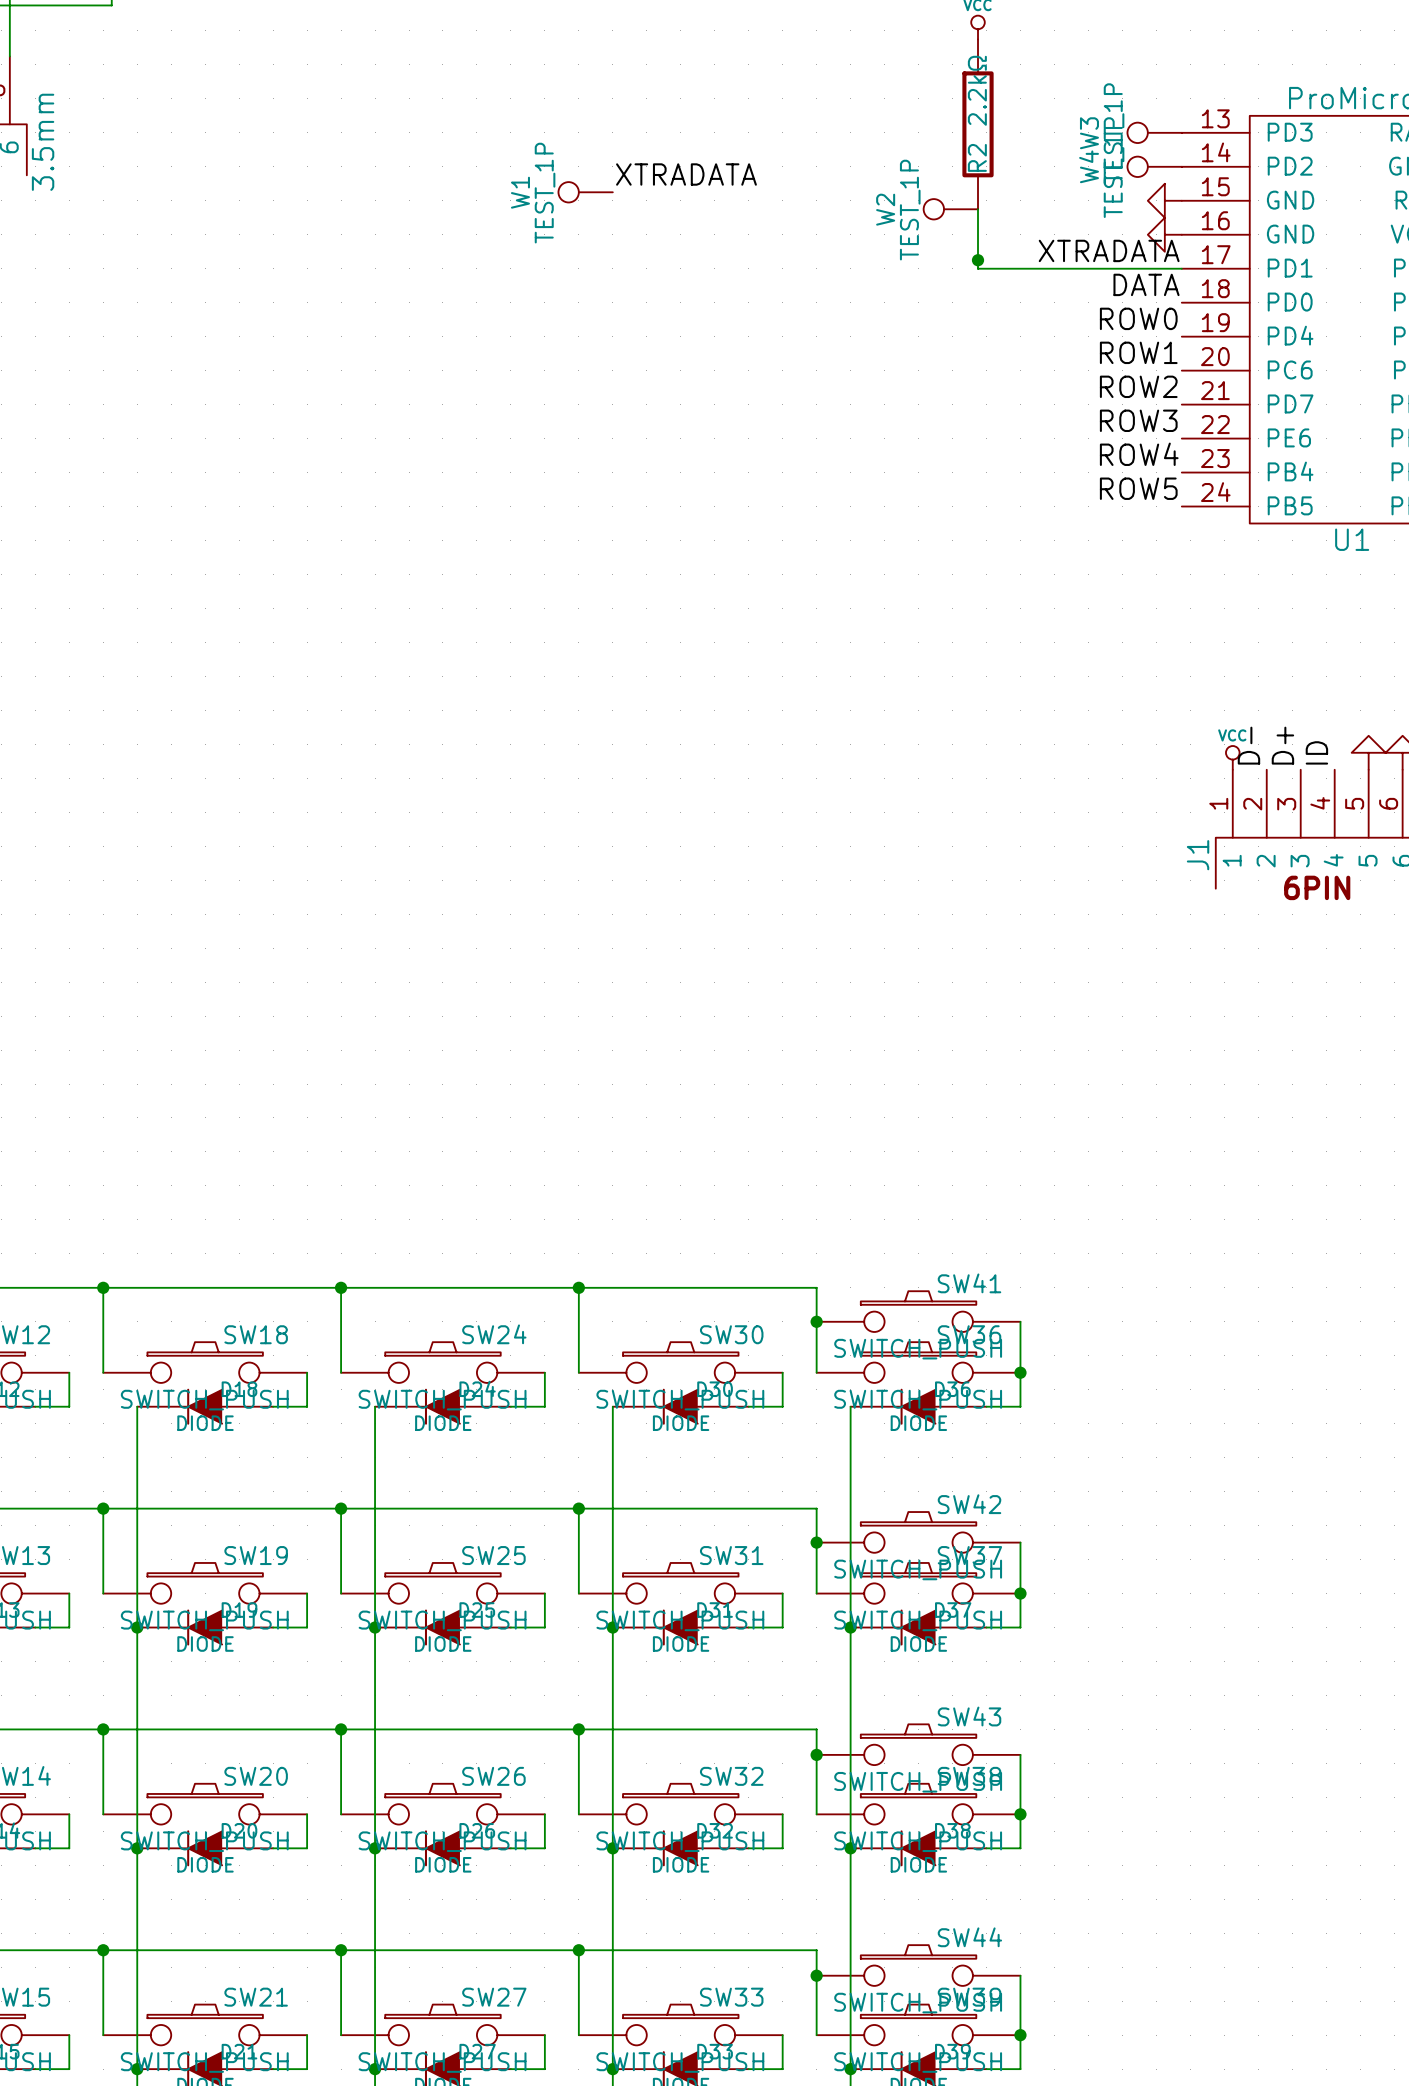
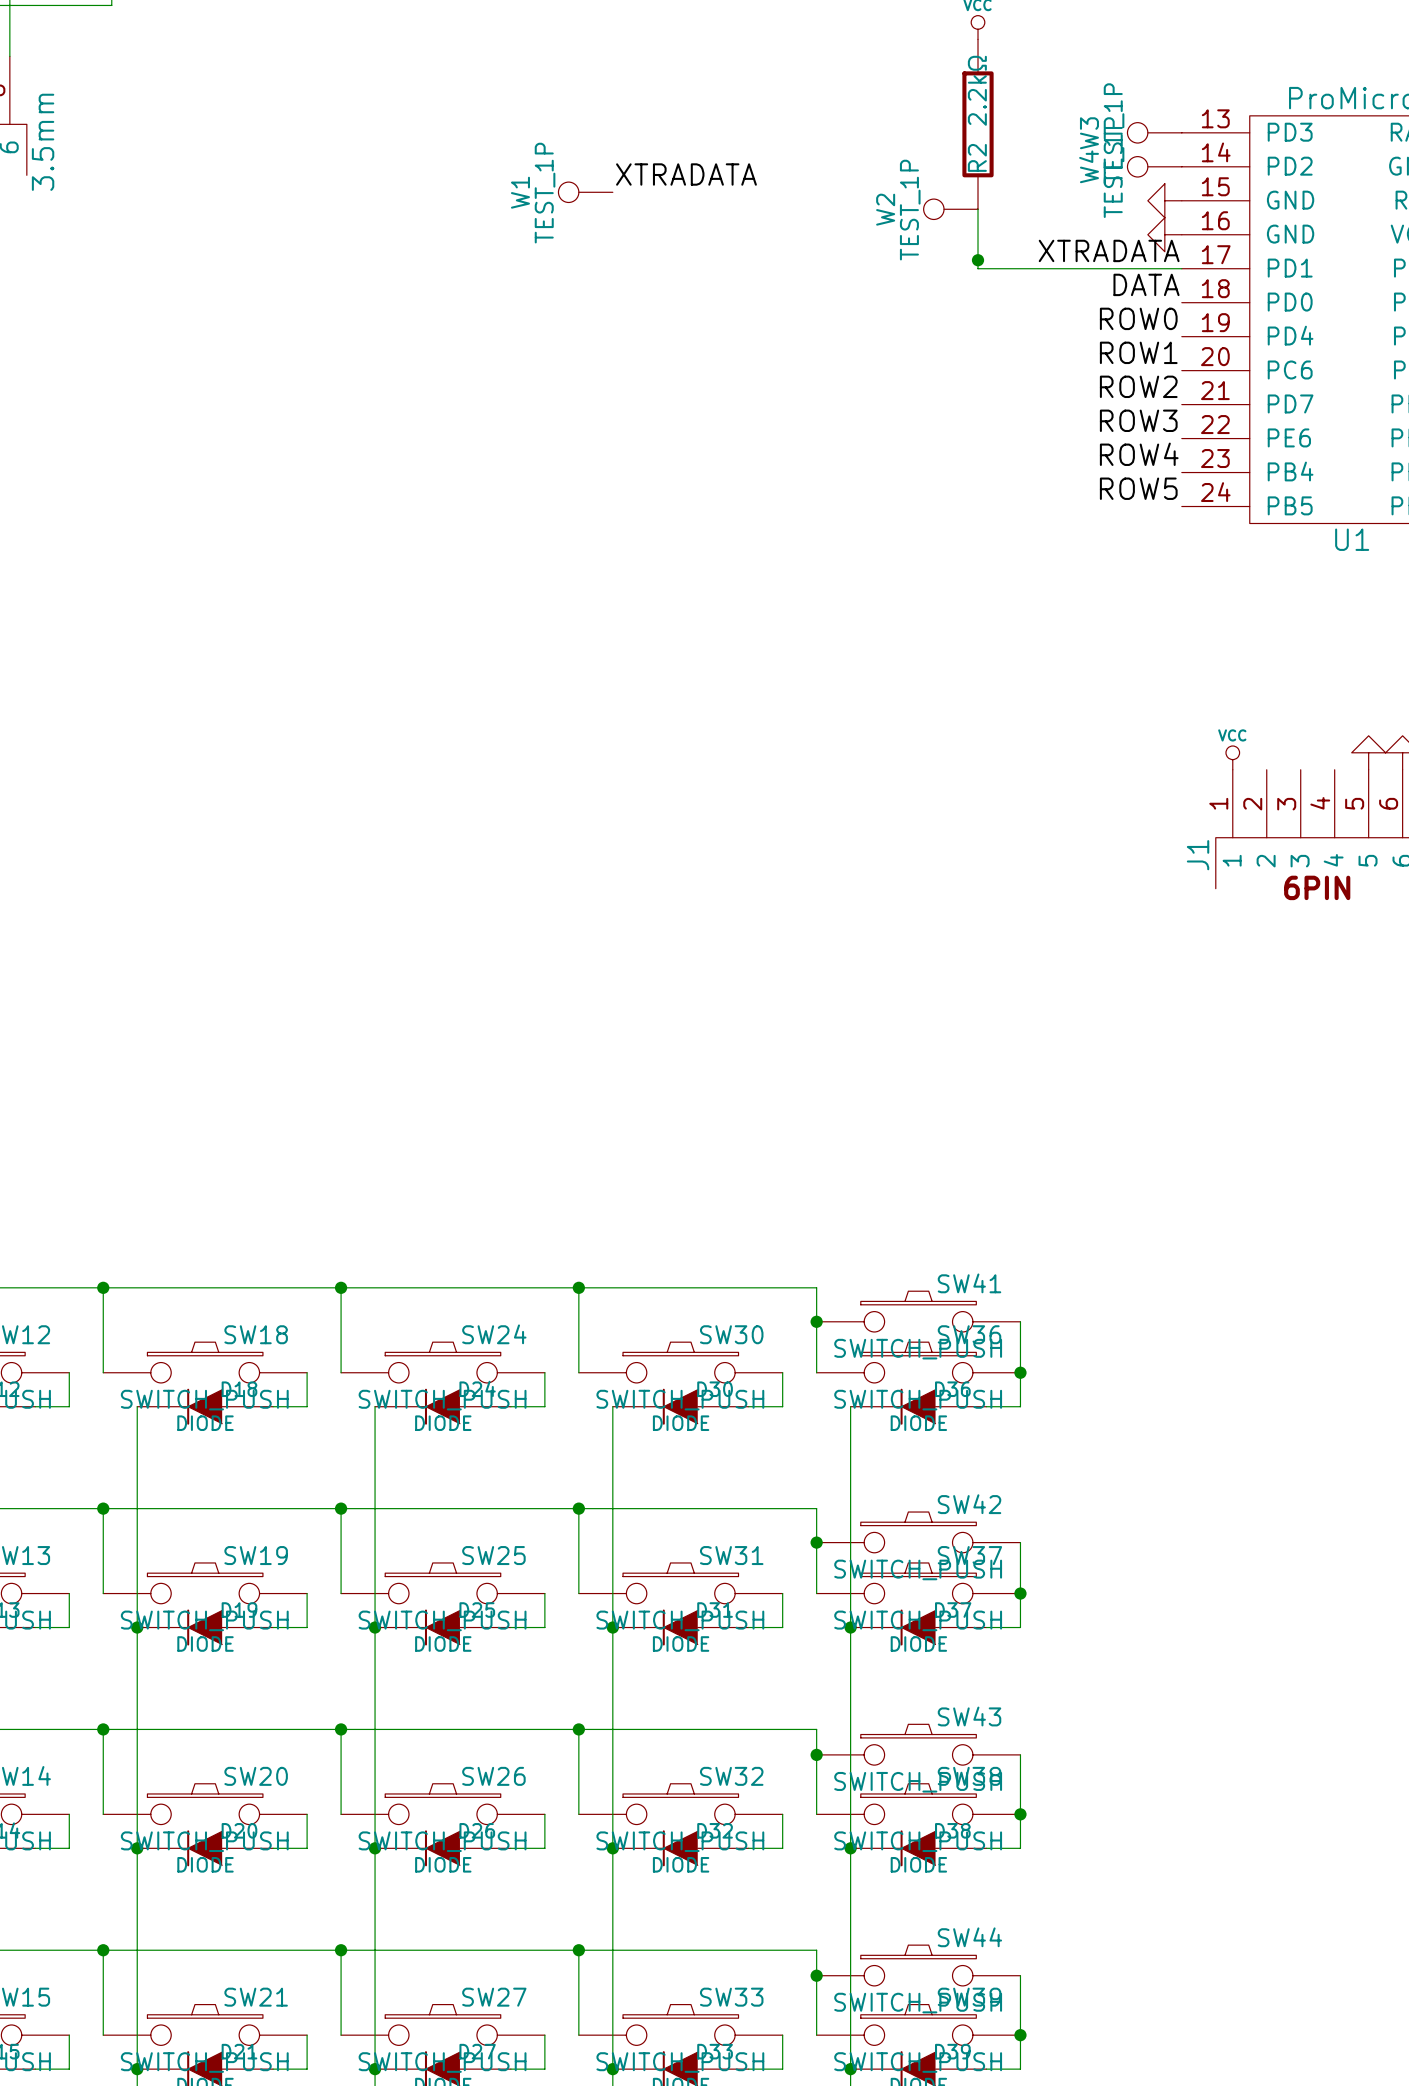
label: D- (1248, 745) -> none
label: D+ (1282, 745) -> none
label: ID (1316, 752) -> none

